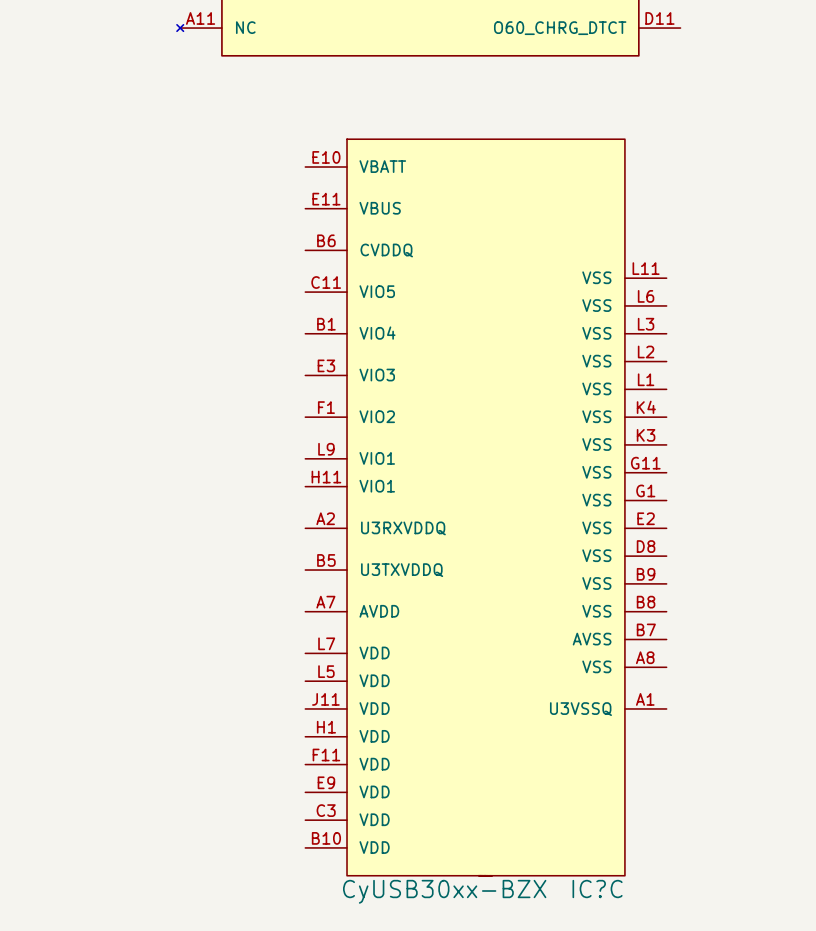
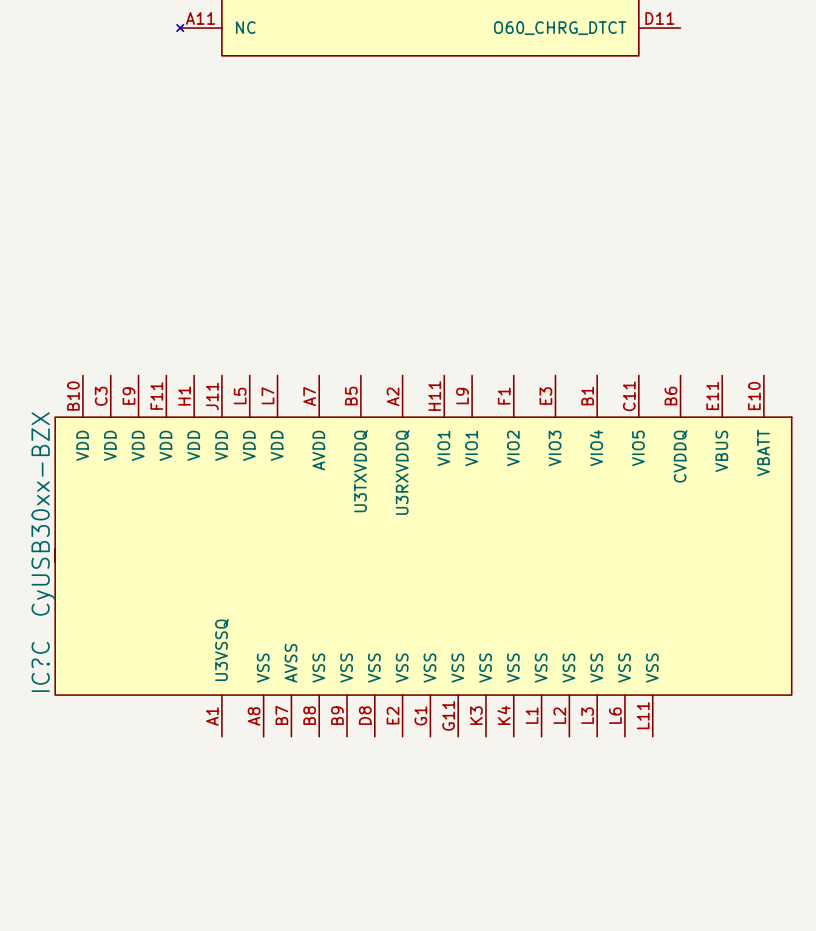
IC?C rotation: 0° (485, 507) -> 90° clockwise (423, 556)

